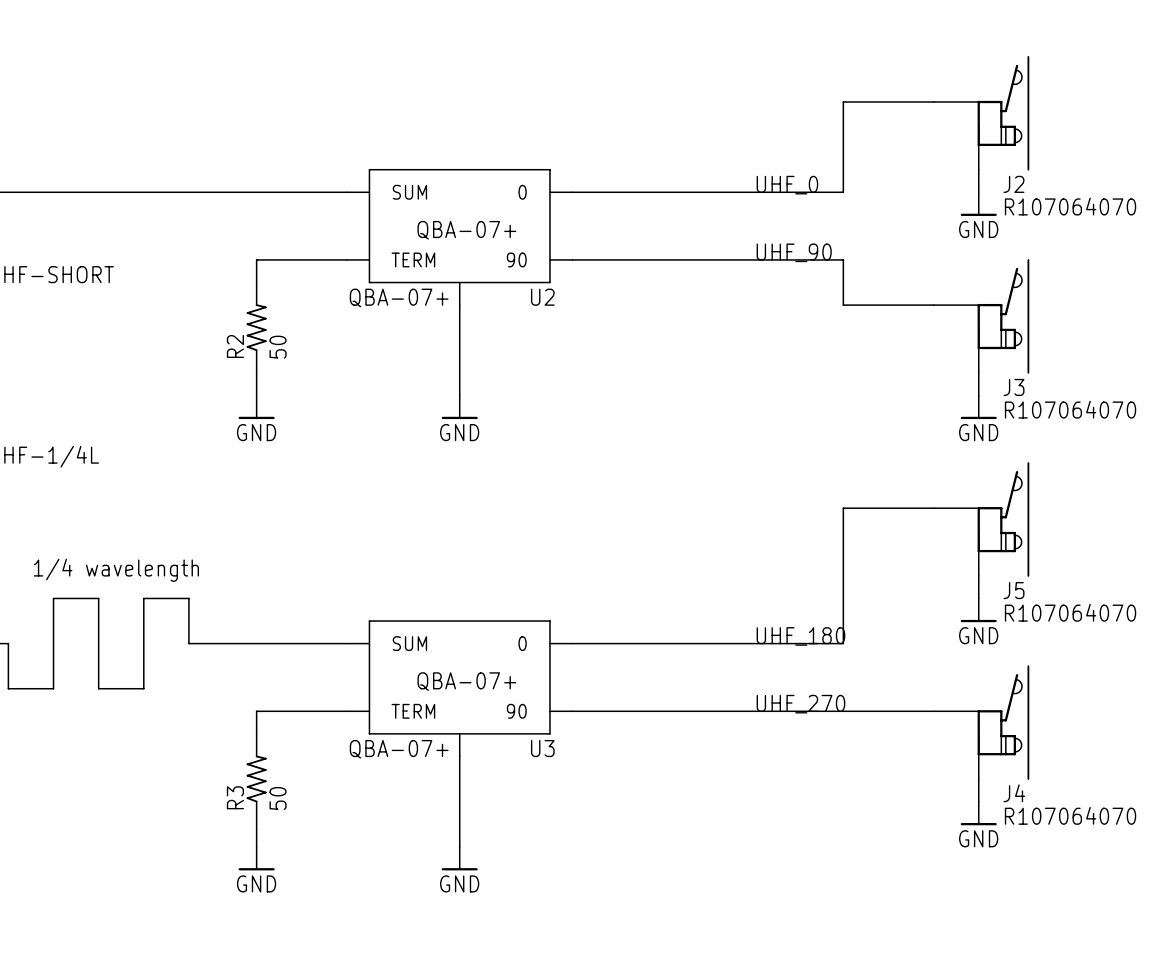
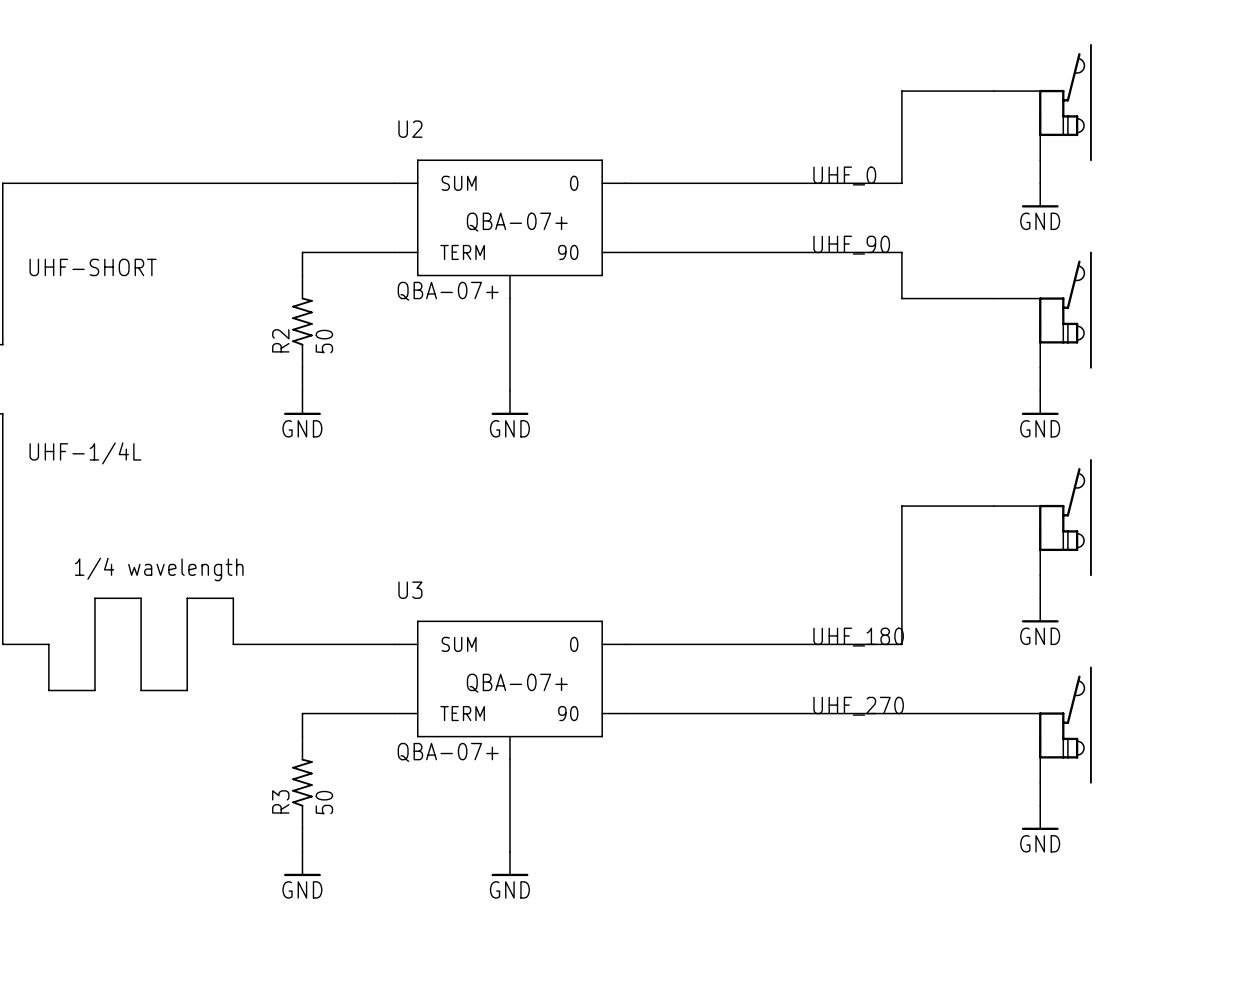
J2 name: J2 (1013, 184) -> none
J2 value: R107064070 (1070, 206) -> none
U2 name position: U2 (542, 297) -> U2 (410, 129)
J3 name: J3 (1013, 387) -> none
J3 value: R107064070 (1070, 409) -> none
J5 name: J5 (1013, 590) -> none
J5 value: R107064070 (1070, 612) -> none
U3 name position: U3 (542, 748) -> U3 (410, 590)
J4 name: J4 (1014, 793) -> none
J4 value: R107064070 (1070, 815) -> none

